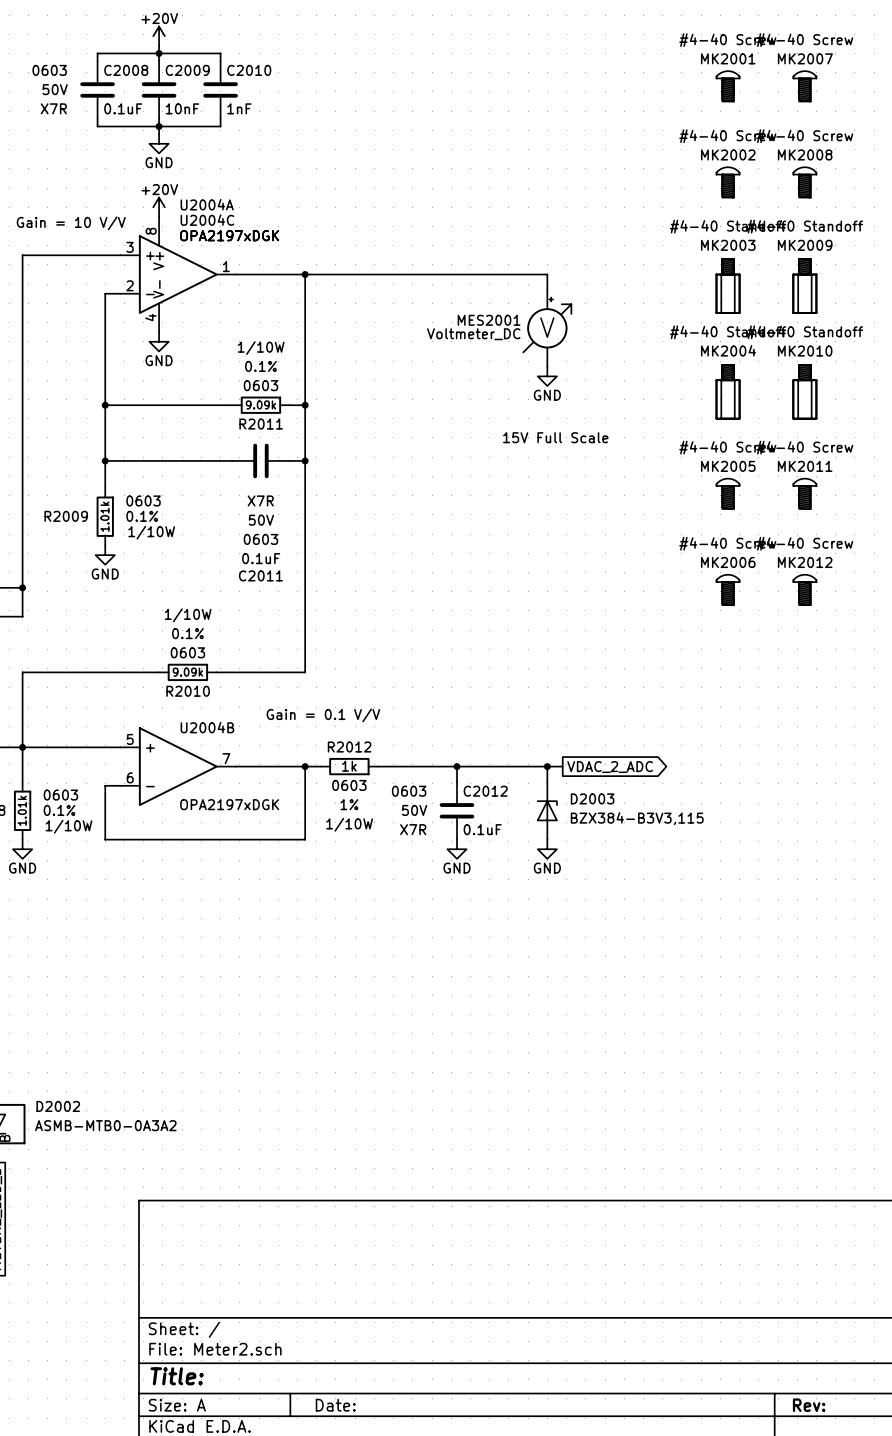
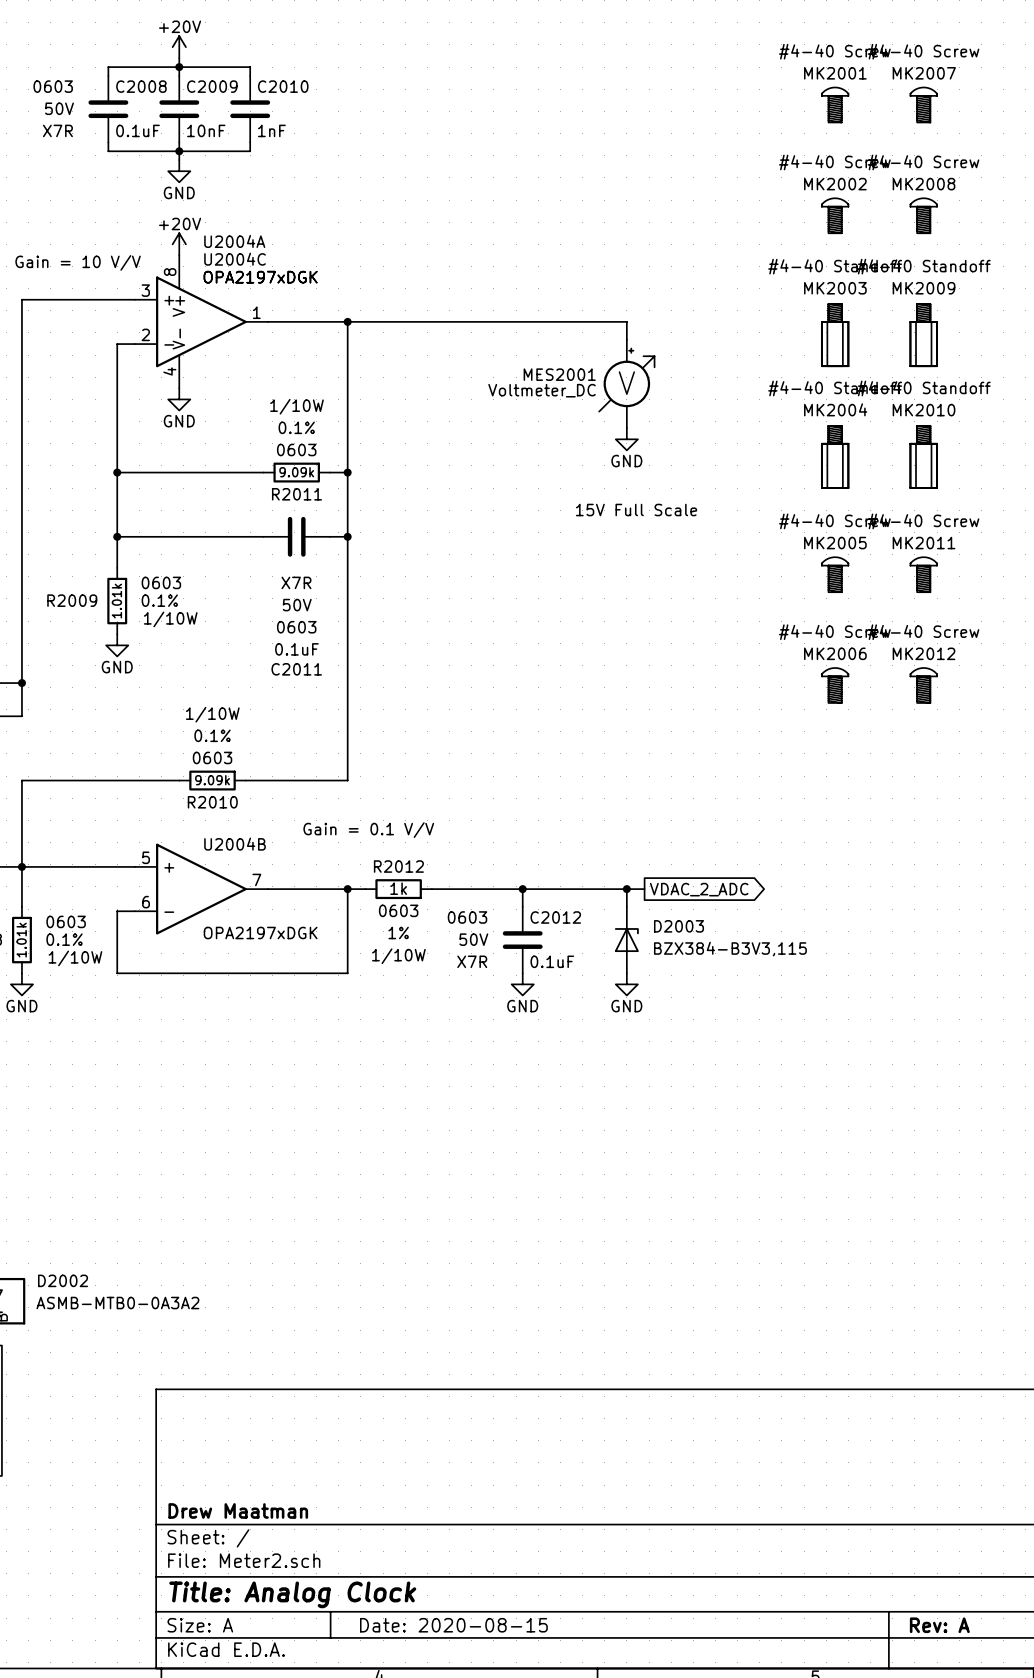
title block: none -> Drew Maatman (238, 1510)
title block: Title: (177, 1376) -> Title: Analog Clock (292, 1594)
title block: Date: (335, 1405) -> Date: 2020-08-15 (453, 1625)
title block: Rev: (809, 1405) -> Rev: A (939, 1625)

